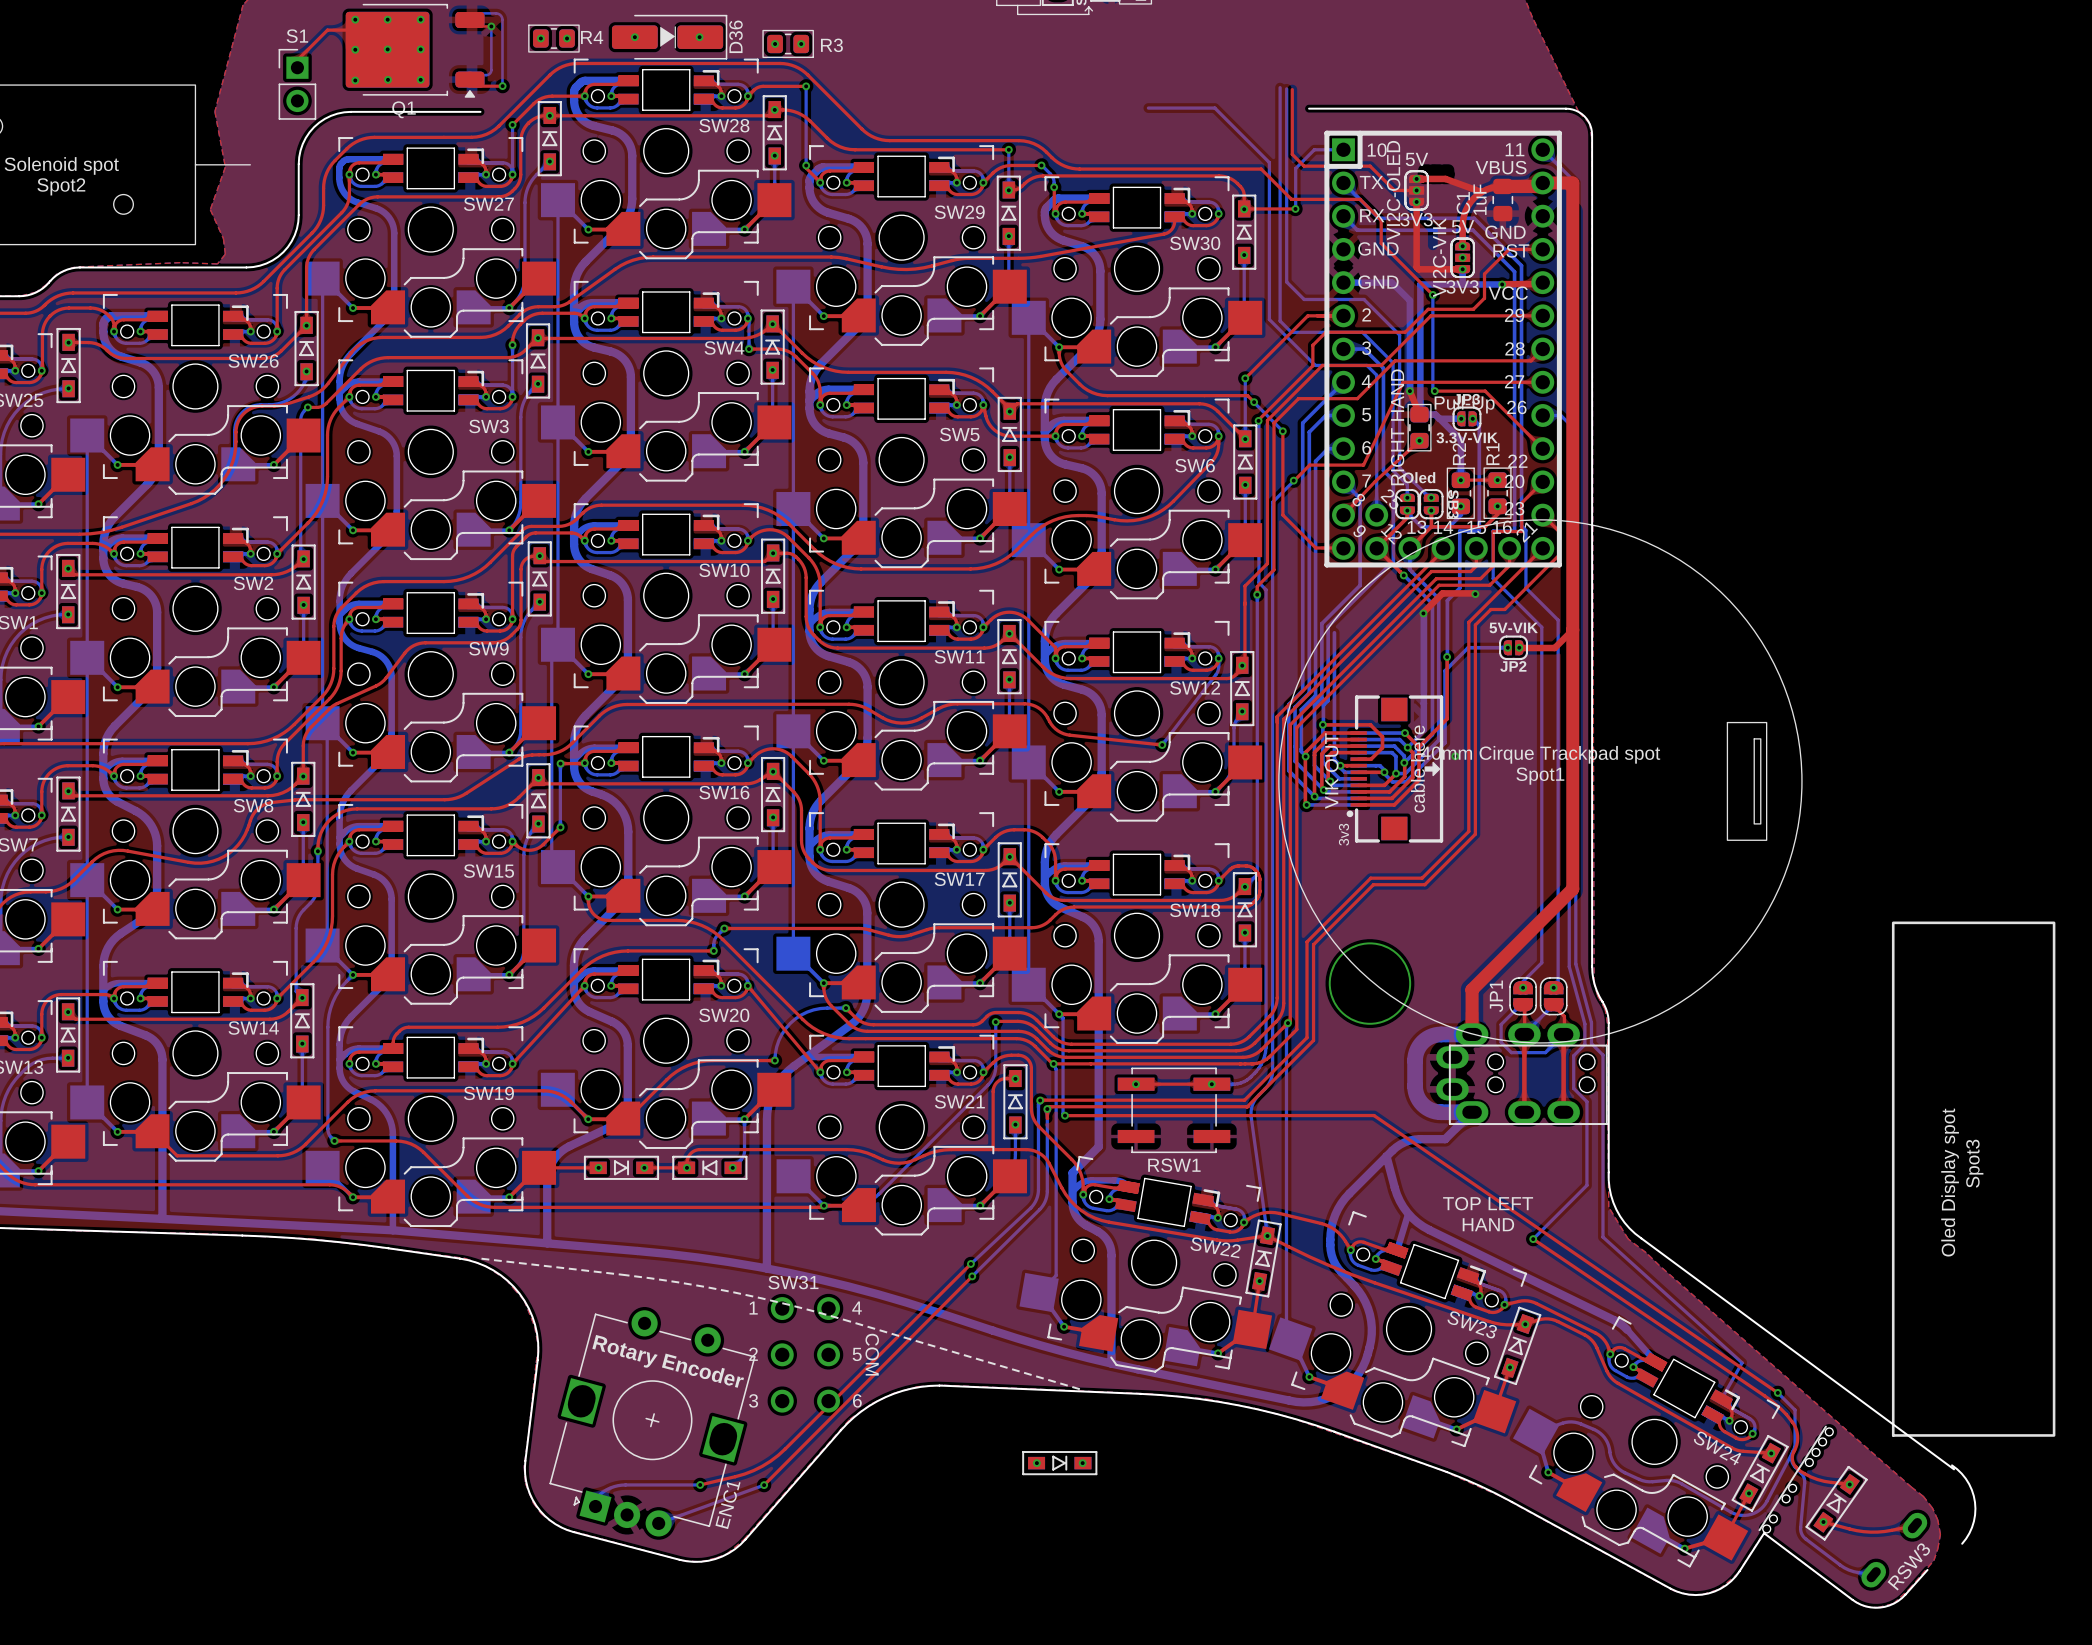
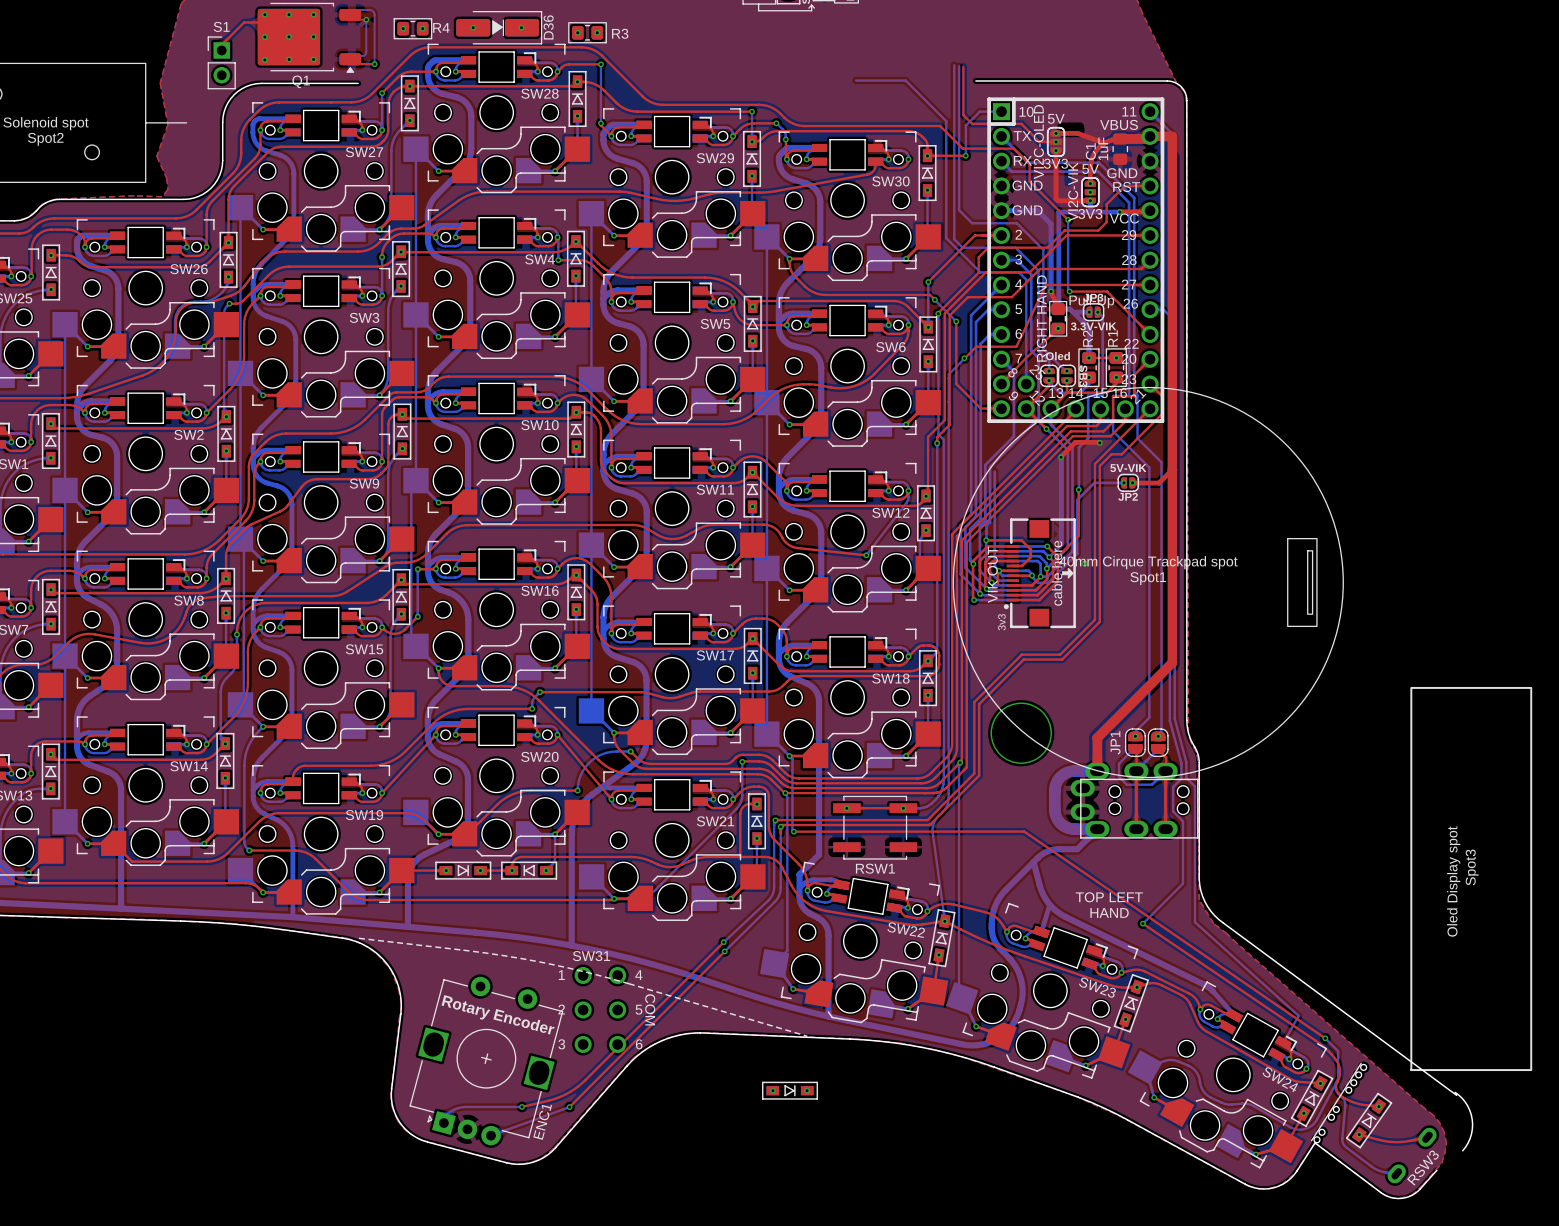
top track: none -> (997, 572) (997, 585)

